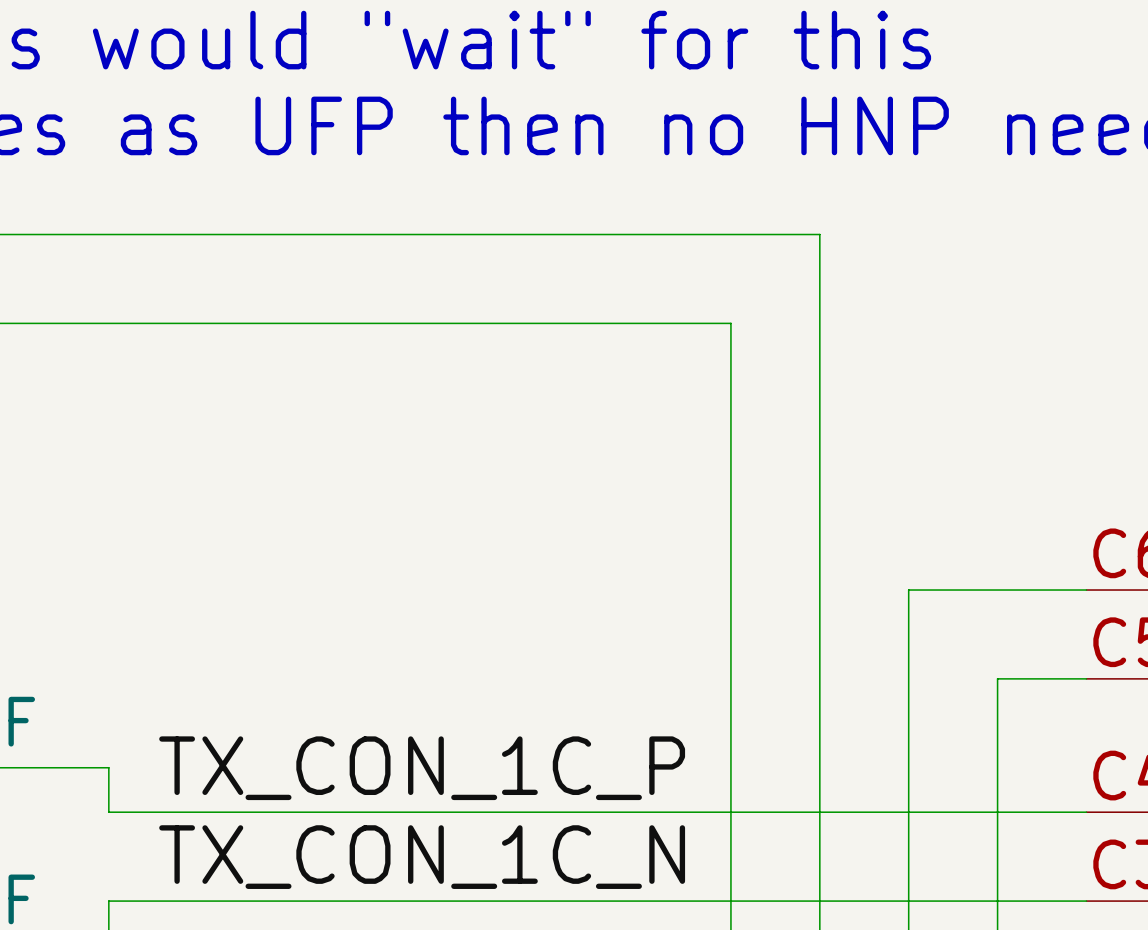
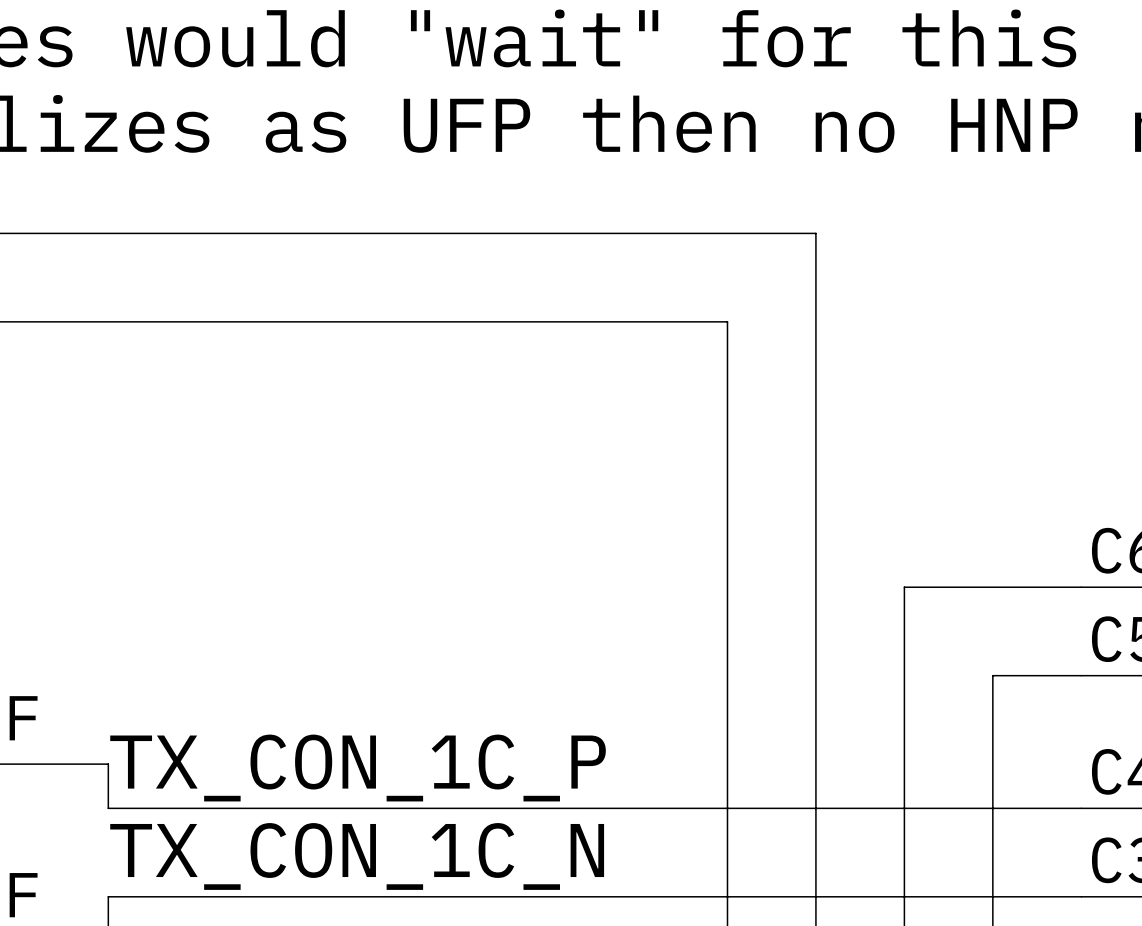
label position: TX_CON_1C_P (422, 768) -> TX_CON_1C_P (358, 768)
label position: TX_CON_1C_N (422, 857) -> TX_CON_1C_N (357, 856)

